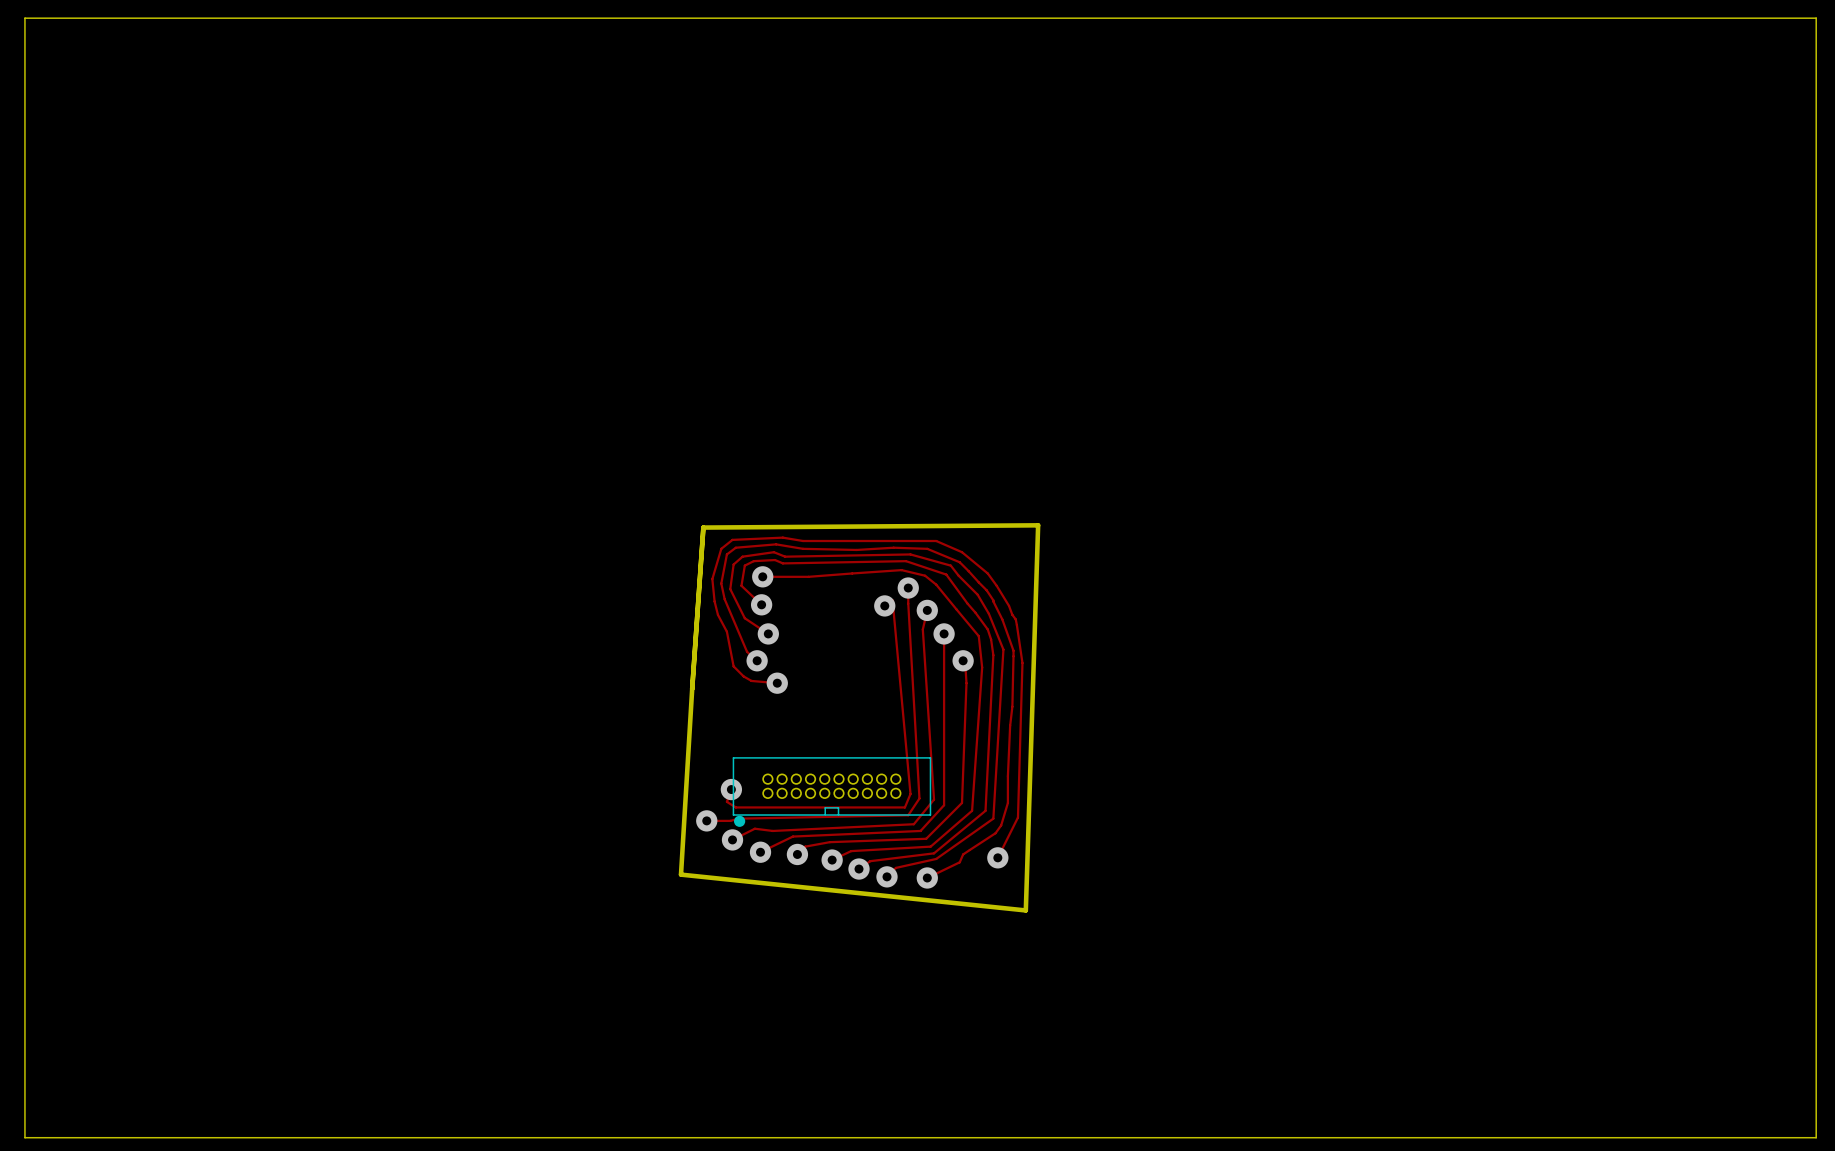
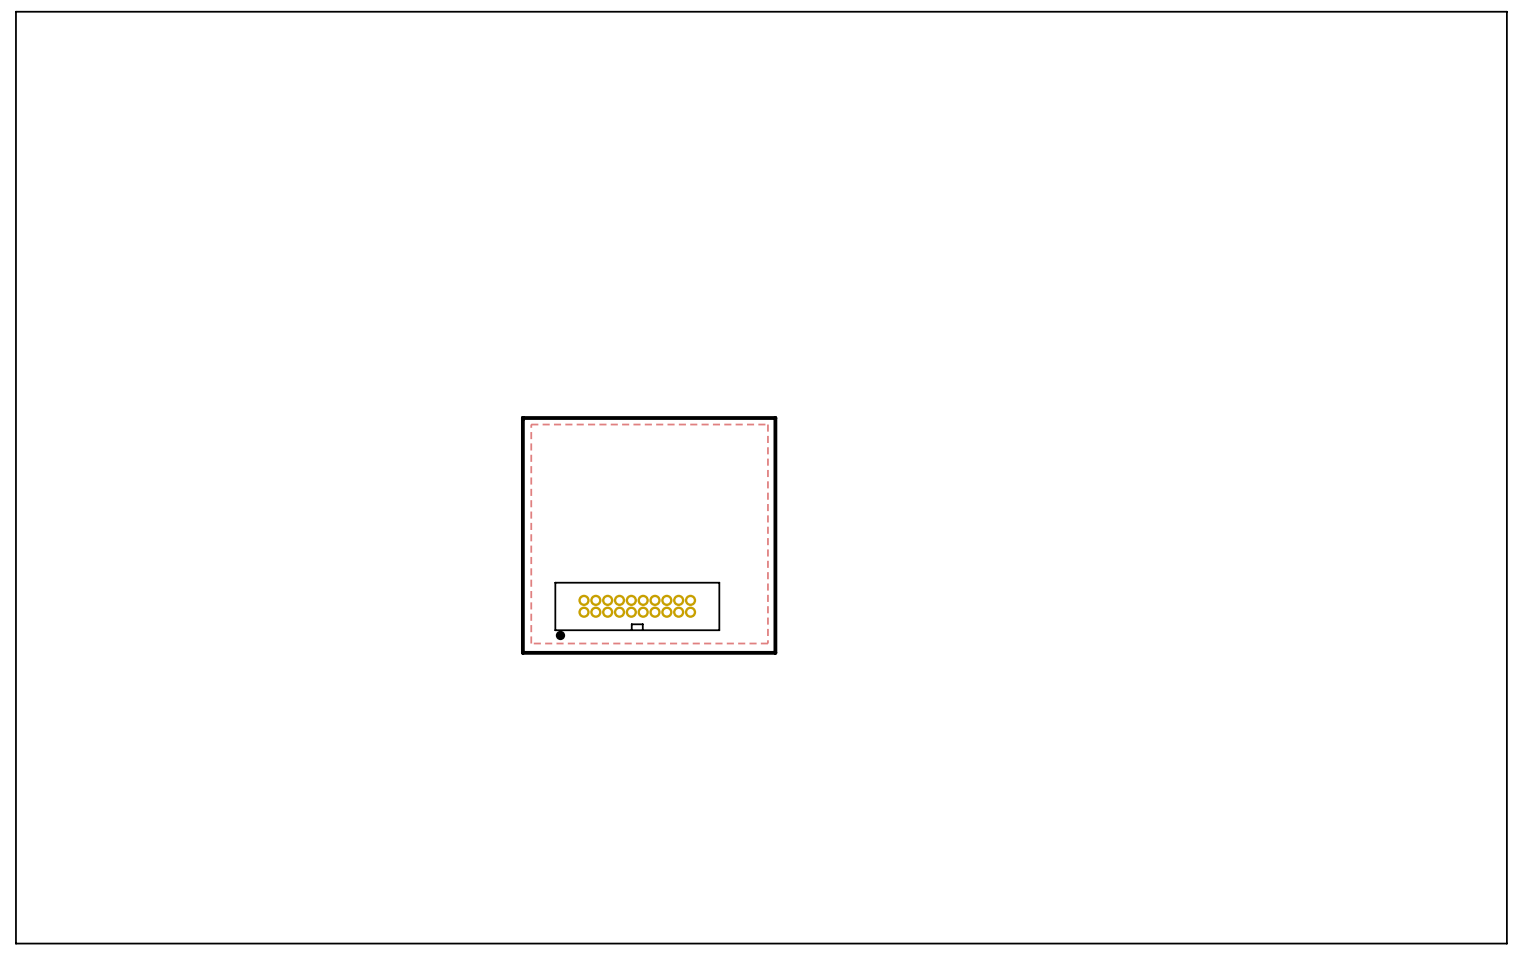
board edge: none -> (522, 418) (775, 418) (775, 652) (522, 652) (522, 418)
zone outline: none -> (531, 424) (767, 424) (767, 643) (531, 643) (531, 424)
board edge: (1038, 525) (703, 527) (681, 874) (1025, 910) (1038, 525) -> none
track: (762, 576) (808, 576) (901, 570) (925, 575) (936, 584) (978, 636) (982, 667) (972, 810) (930, 846) (851, 851) (832, 860) -> none
via: (762, 576) -> none
track: (908, 588) (919, 798) (908, 815) (706, 820) -> none
via: (908, 588) -> none
track: (761, 604) (741, 585) (744, 565) (753, 561) (775, 560) (782, 563) (906, 561) (946, 574) (987, 629) (993, 655) (985, 810) (934, 853) (870, 861) (859, 869) -> none
via: (761, 604) -> none
track: (884, 605) (892, 600) (910, 794) (904, 807) (735, 807) (726, 801) (731, 789) -> none
via: (884, 605) -> none
track: (927, 610) (922, 629) (934, 799) (913, 824) (772, 830) (754, 828) (732, 839) -> none
via: (927, 610) -> none
track: (768, 633) (744, 618) (730, 589) (733, 564) (742, 556) (773, 552) (785, 556) (910, 554) (950, 565) (977, 594) (988, 613) (1003, 649) (993, 818) (936, 858) (895, 867) (887, 876) -> none
via: (768, 633) -> none
track: (944, 633) (944, 805) (920, 830) (792, 836) (760, 852) -> none
via: (944, 633) -> none
track: (757, 660) (747, 651) (724, 599) (721, 583) (726, 554) (735, 547) (776, 544) (803, 548) (927, 548) (959, 562) (986, 590) (1002, 619) (1013, 650) (1007, 802) (1001, 825) (995, 833) (963, 854) (959, 862) (927, 877) -> none
via: (757, 660) -> none
track: (963, 660) (965, 665) (966, 683) (962, 802) (926, 838) (829, 842) (805, 846) (797, 854) -> none
via: (963, 660) -> none
track: (777, 683) (751, 680) (733, 666) (726, 631) (717, 614) (714, 601) (712, 579) (721, 548) (732, 539) (782, 537) (803, 541) (936, 541) (962, 552) (987, 573) (1009, 605) (1015, 619) (1022, 663) (1017, 817) (997, 857) -> none
via: (777, 683) -> none
part: none -> (637, 611)
via: (731, 789) -> none
part: (831, 792) -> none
via: (706, 820) -> none
via: (732, 839) -> none
via: (760, 852) -> none
via: (797, 854) -> none
via: (997, 857) -> none
via: (832, 860) -> none
via: (859, 869) -> none
via: (887, 876) -> none
via: (927, 877) -> none

